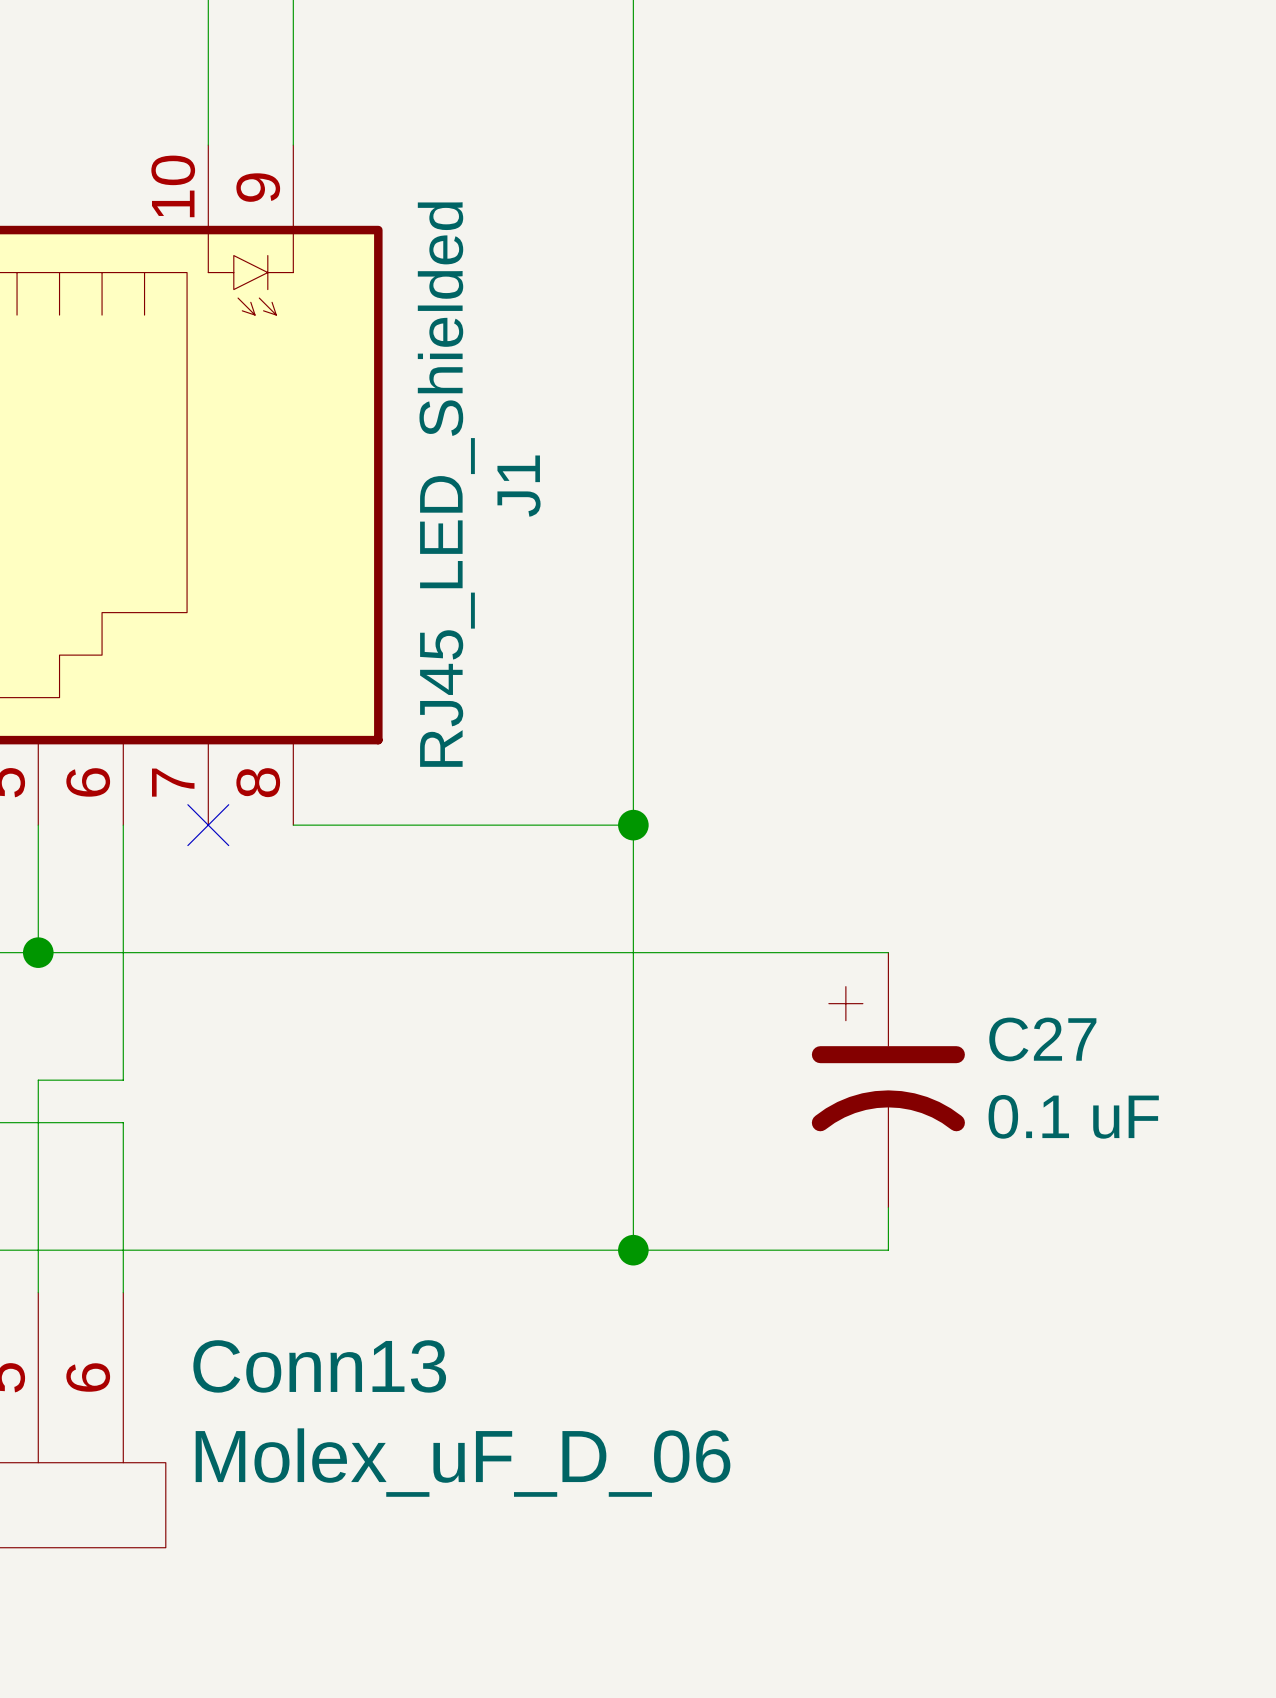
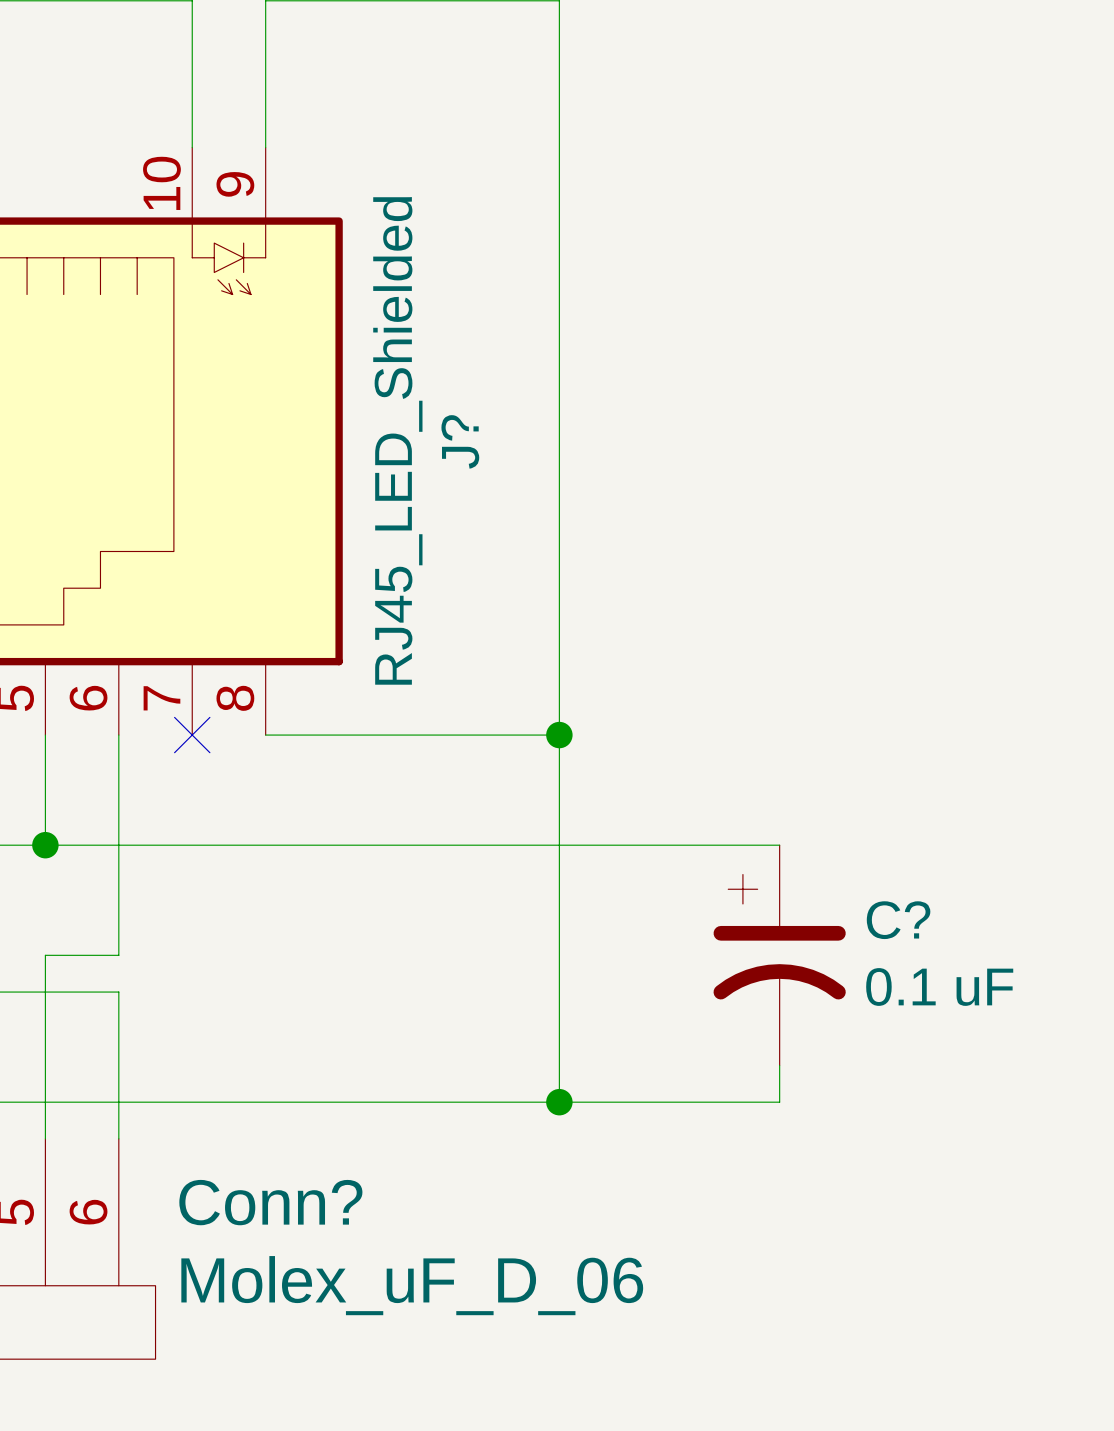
J1 name: J1 (519, 486) -> J? (460, 441)
C27 name: C27 (1042, 1039) -> C? (898, 920)
Conn13 name: Conn13 (319, 1366) -> Conn? (270, 1202)

